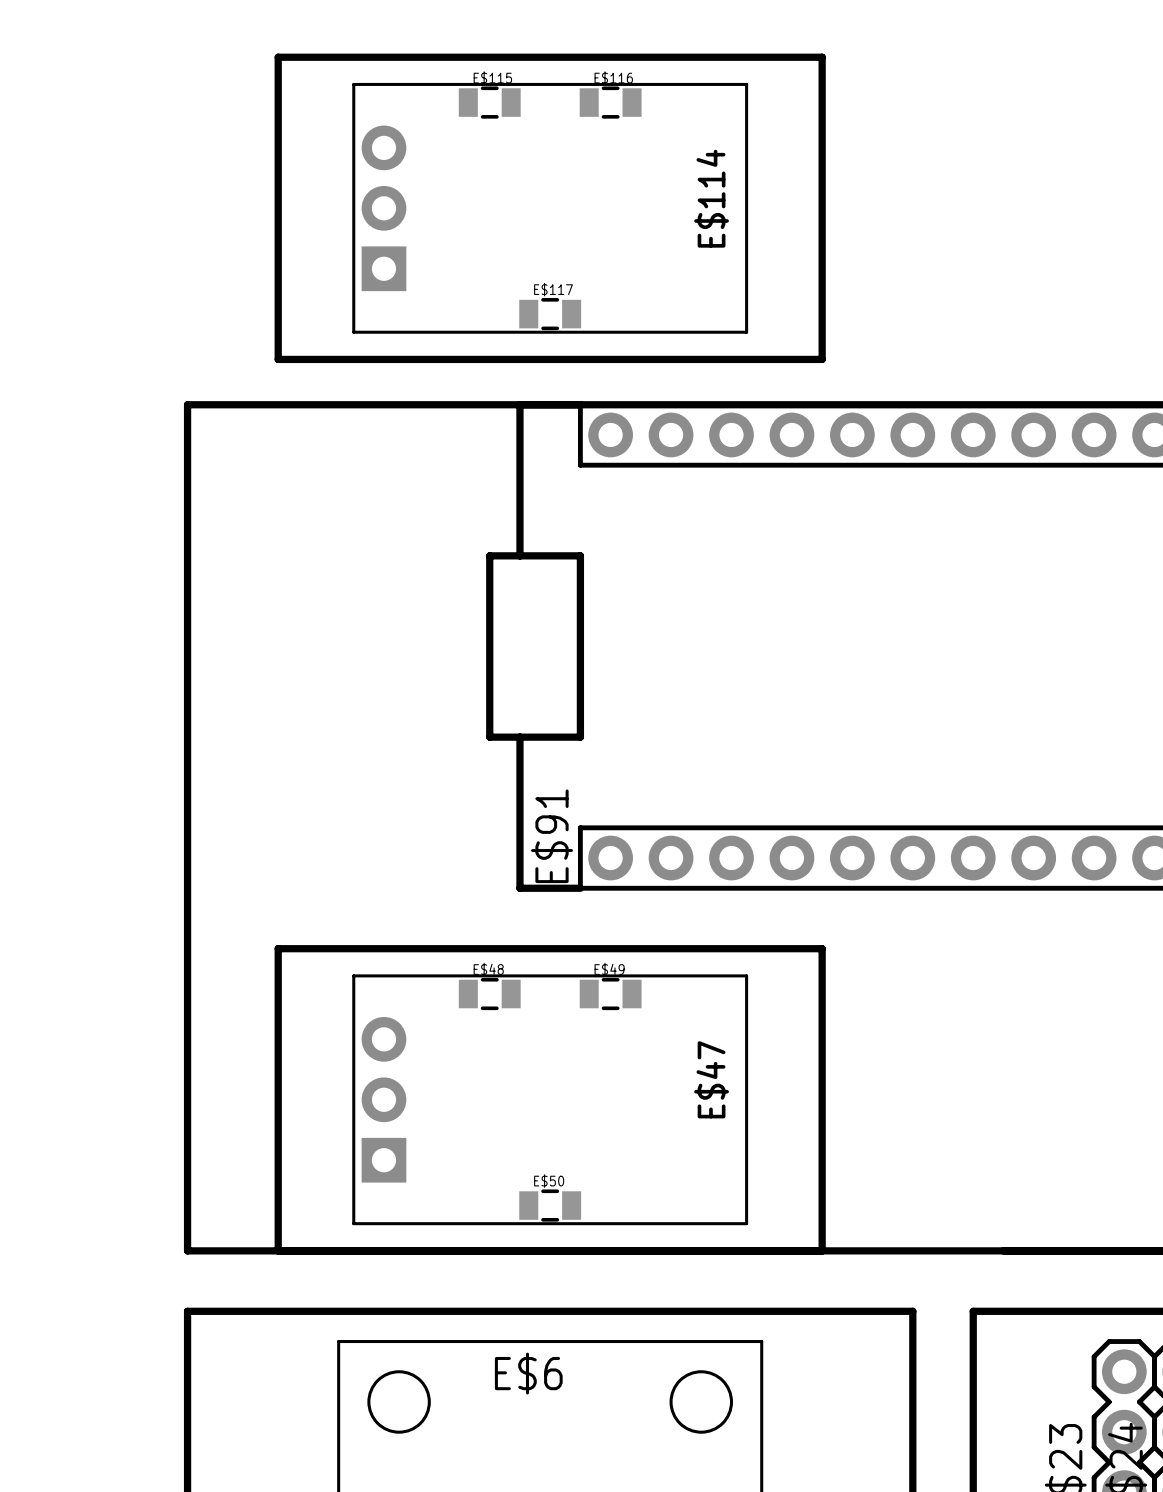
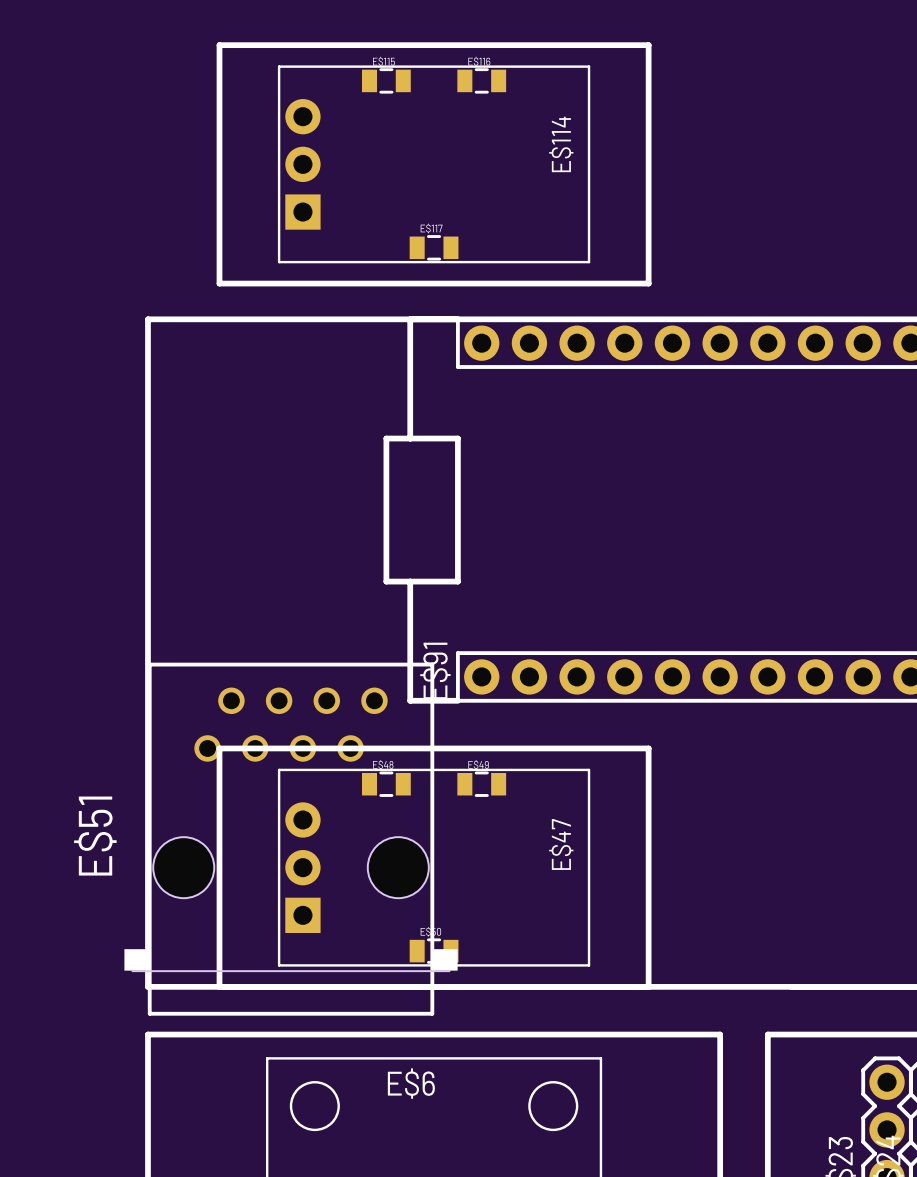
E$51: none -> (291, 839)

